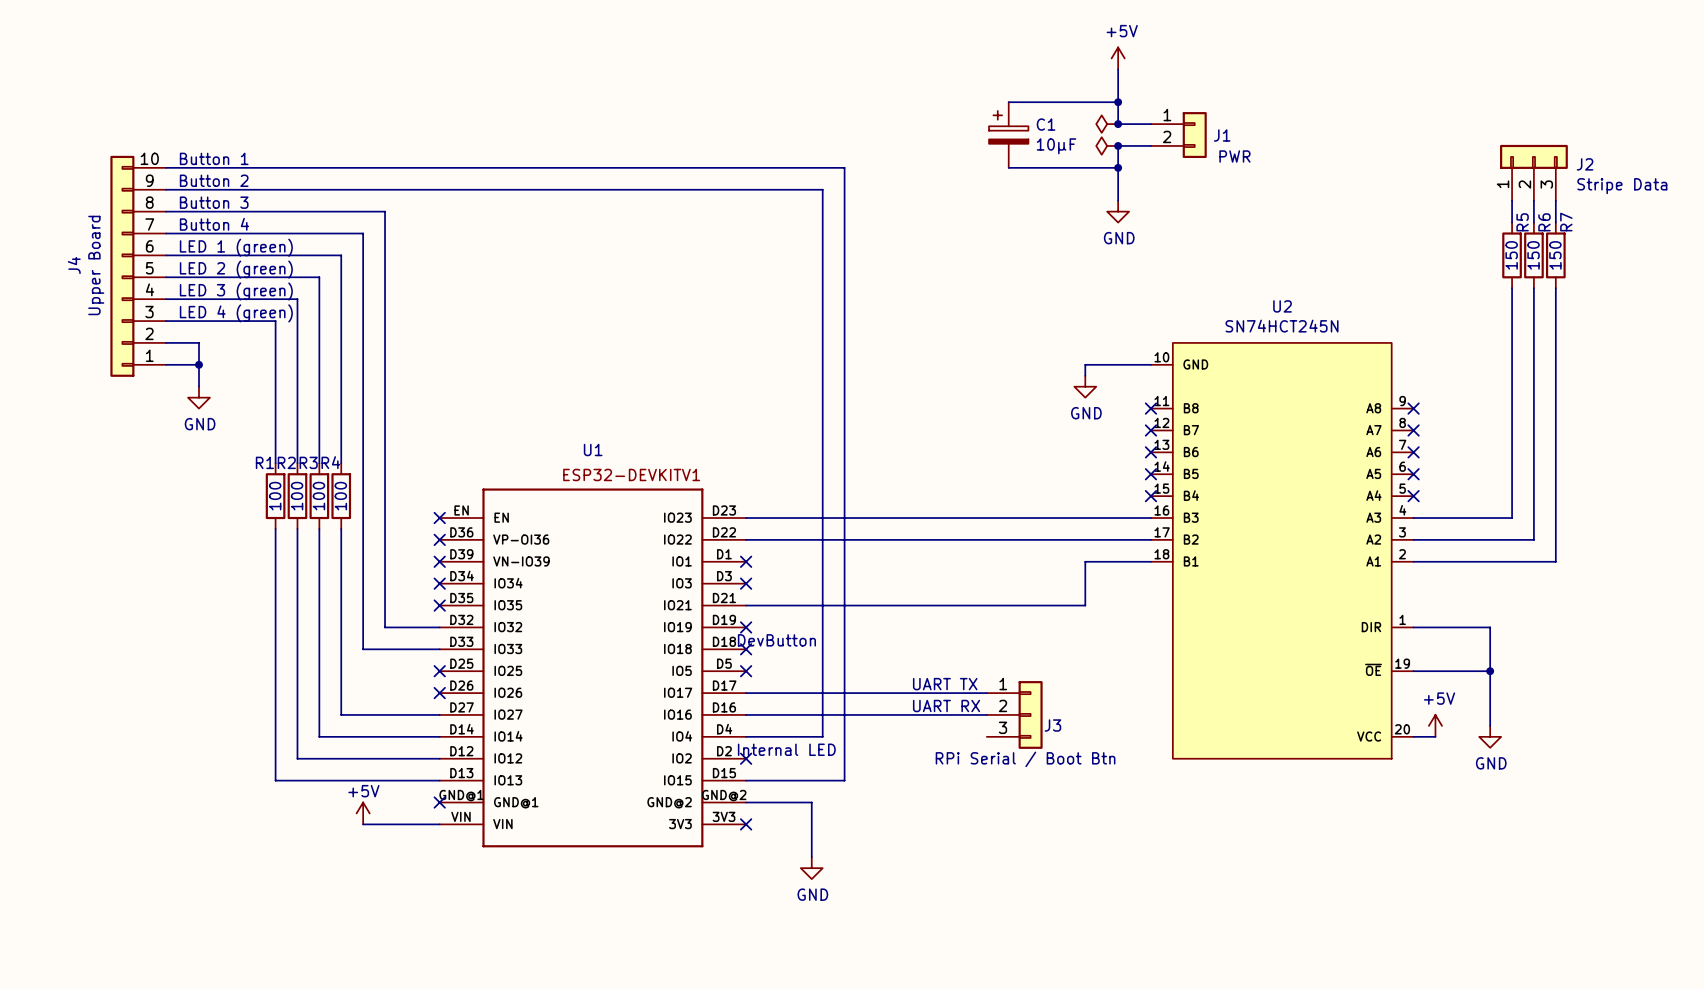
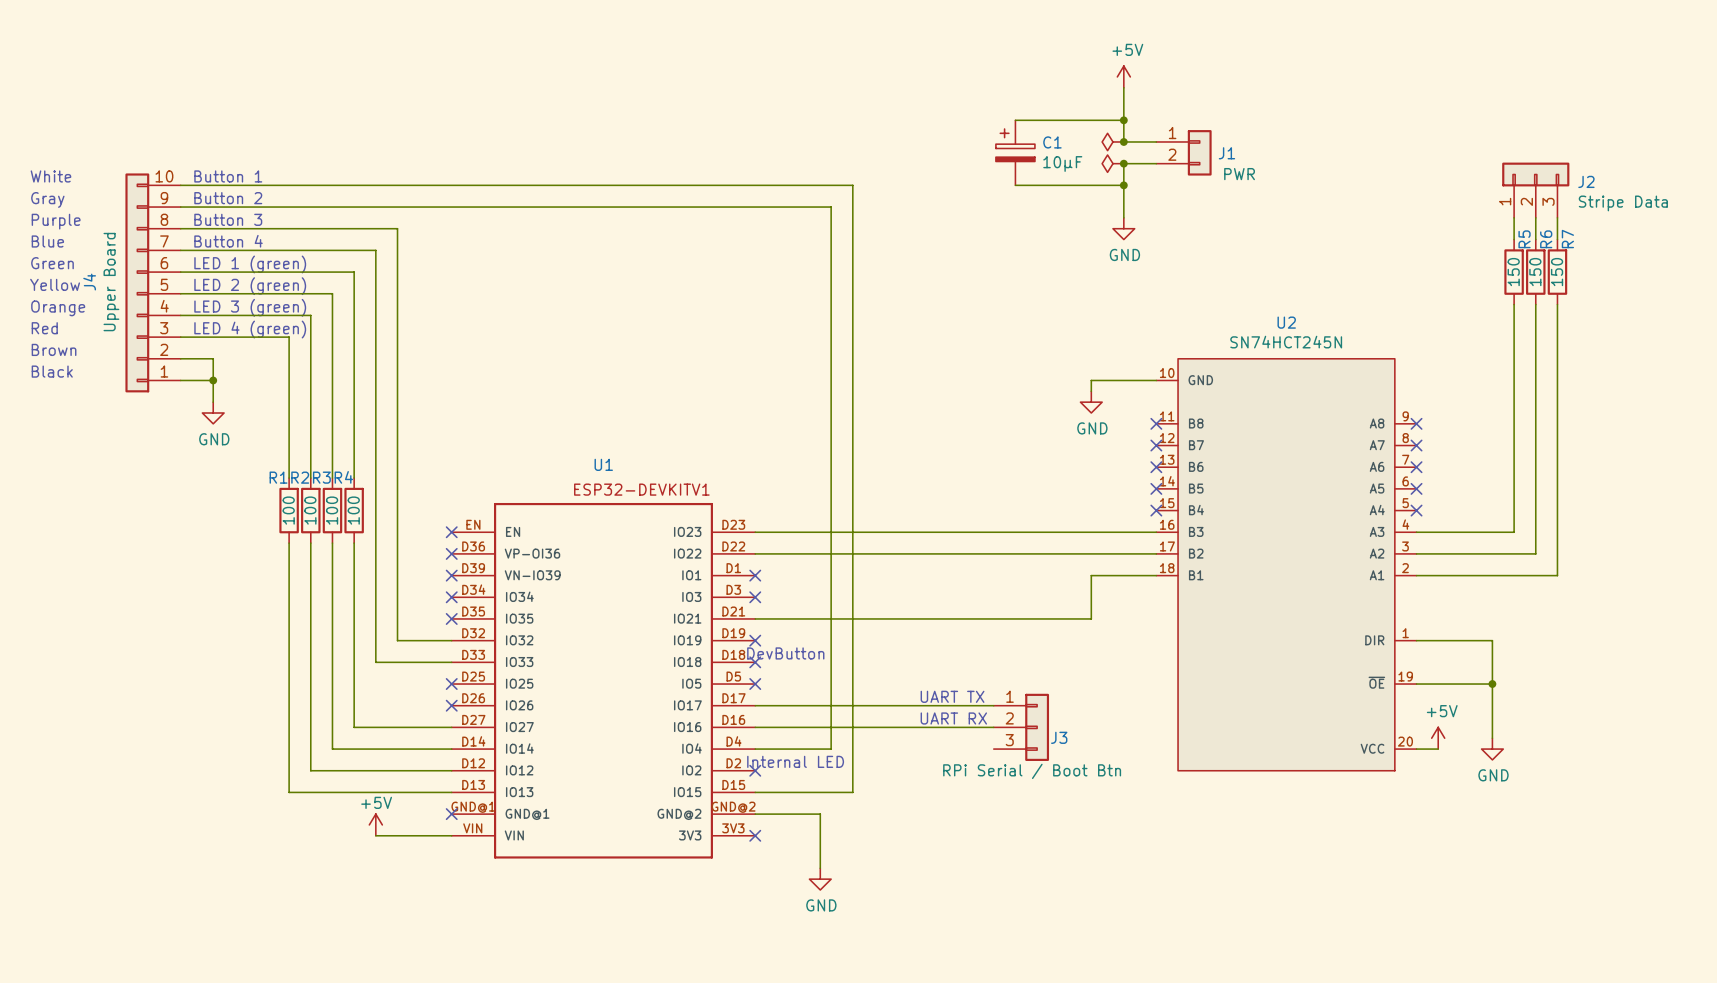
text: none -> White (50, 176)
text: none -> Gray (47, 199)
text: none -> Purple (56, 221)
text: none -> Blue (47, 241)
text: none -> Green (52, 263)
text: none -> Yellow (55, 284)
text: none -> Orange (58, 308)
text: none -> Red (44, 328)
text: none -> Brown (54, 349)
text: none -> Black (52, 371)

